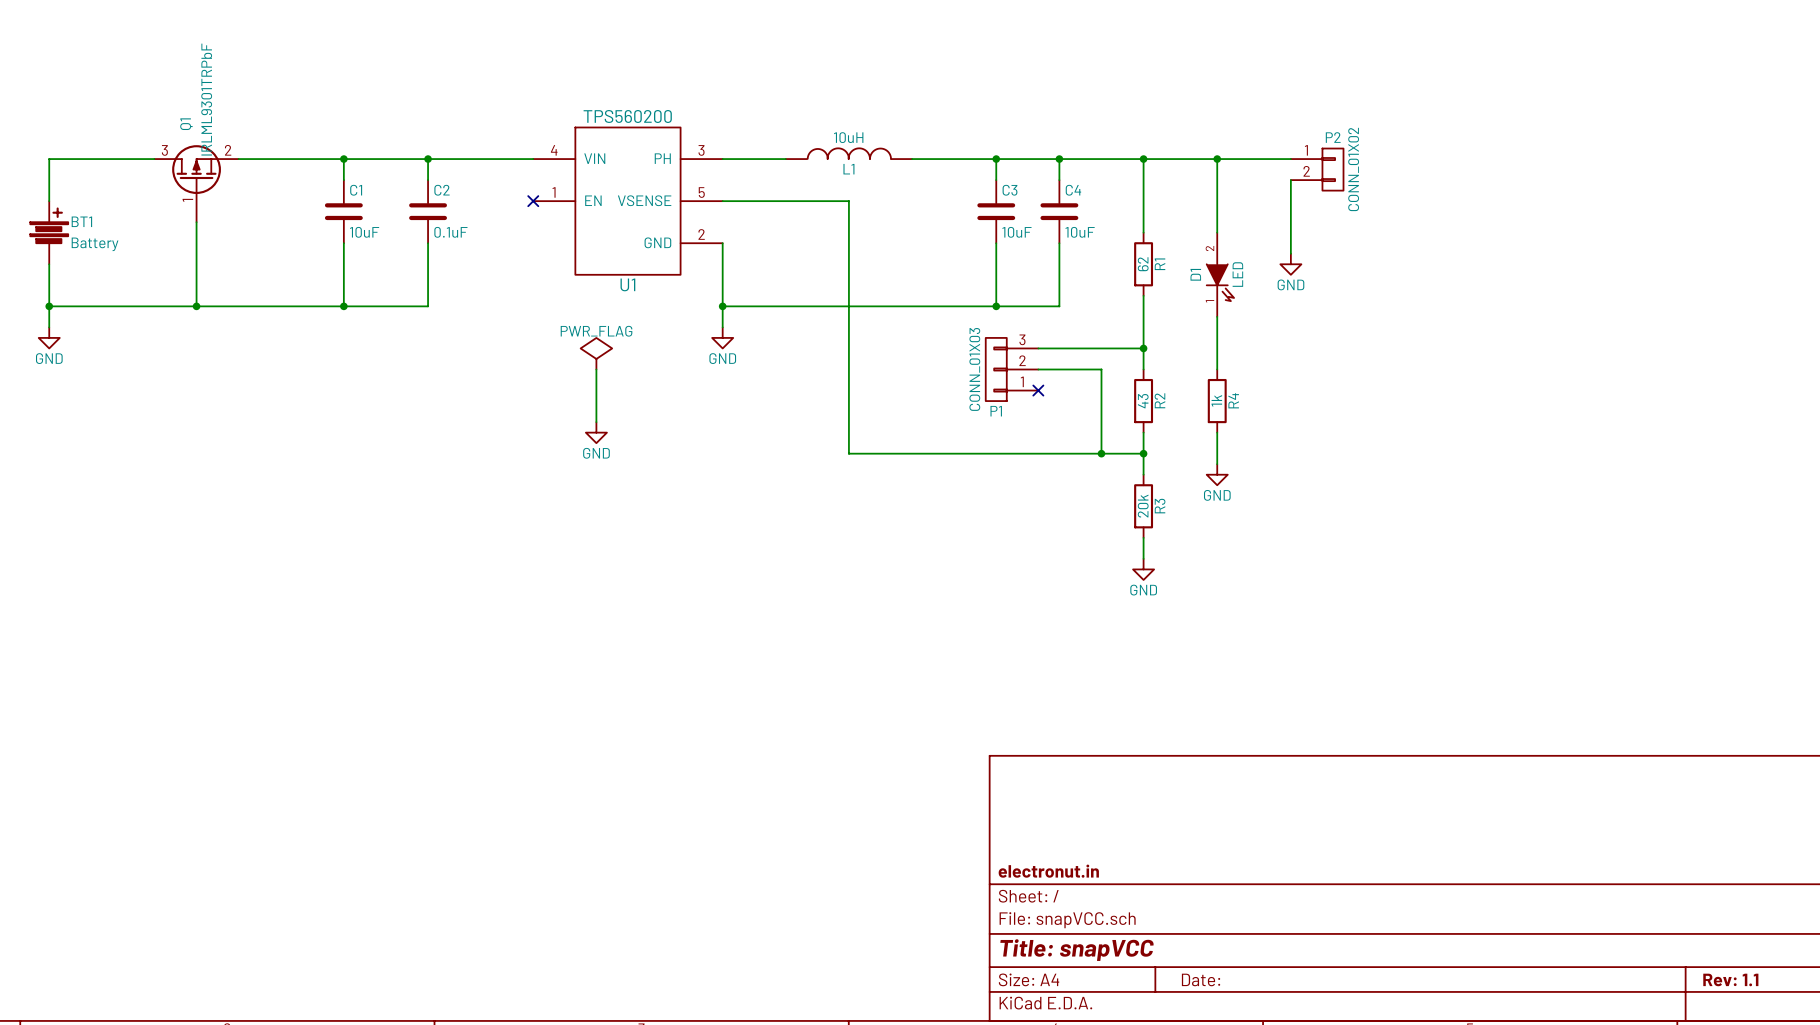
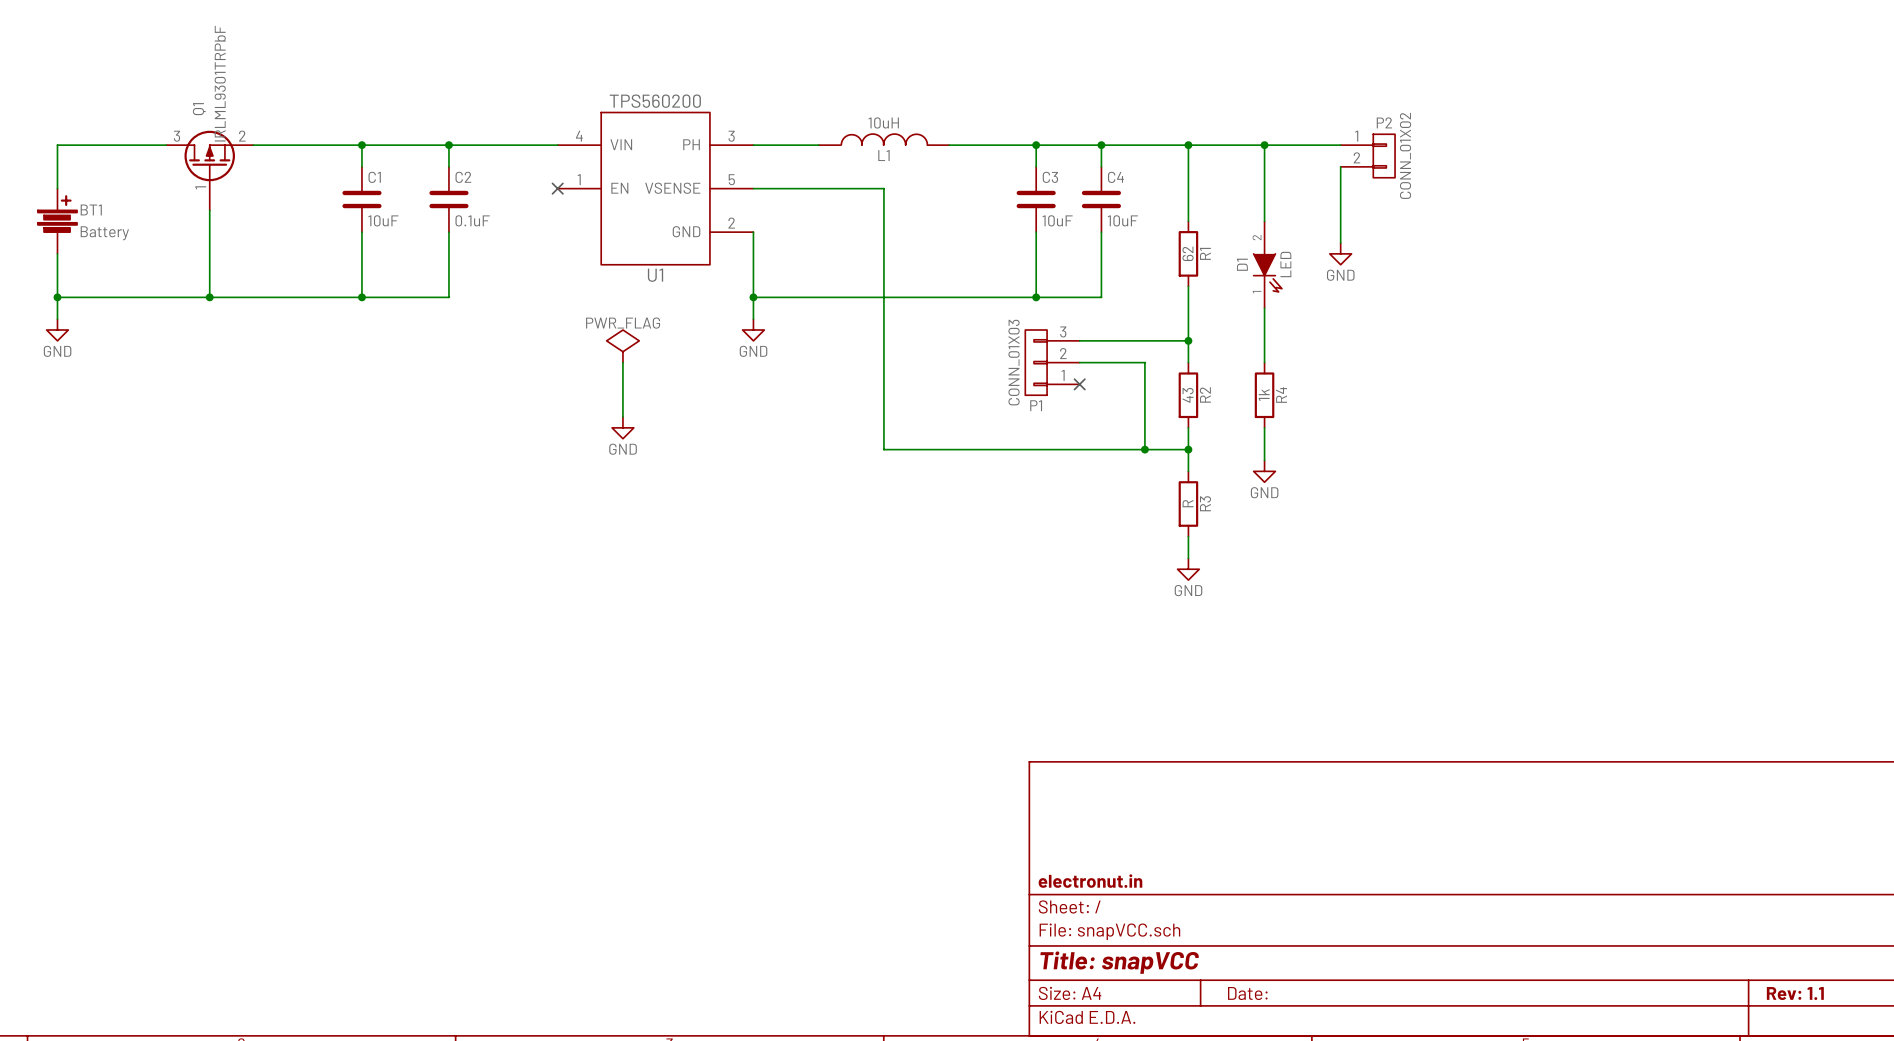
R3 value: 20k (1143, 506) -> R (1188, 503)

